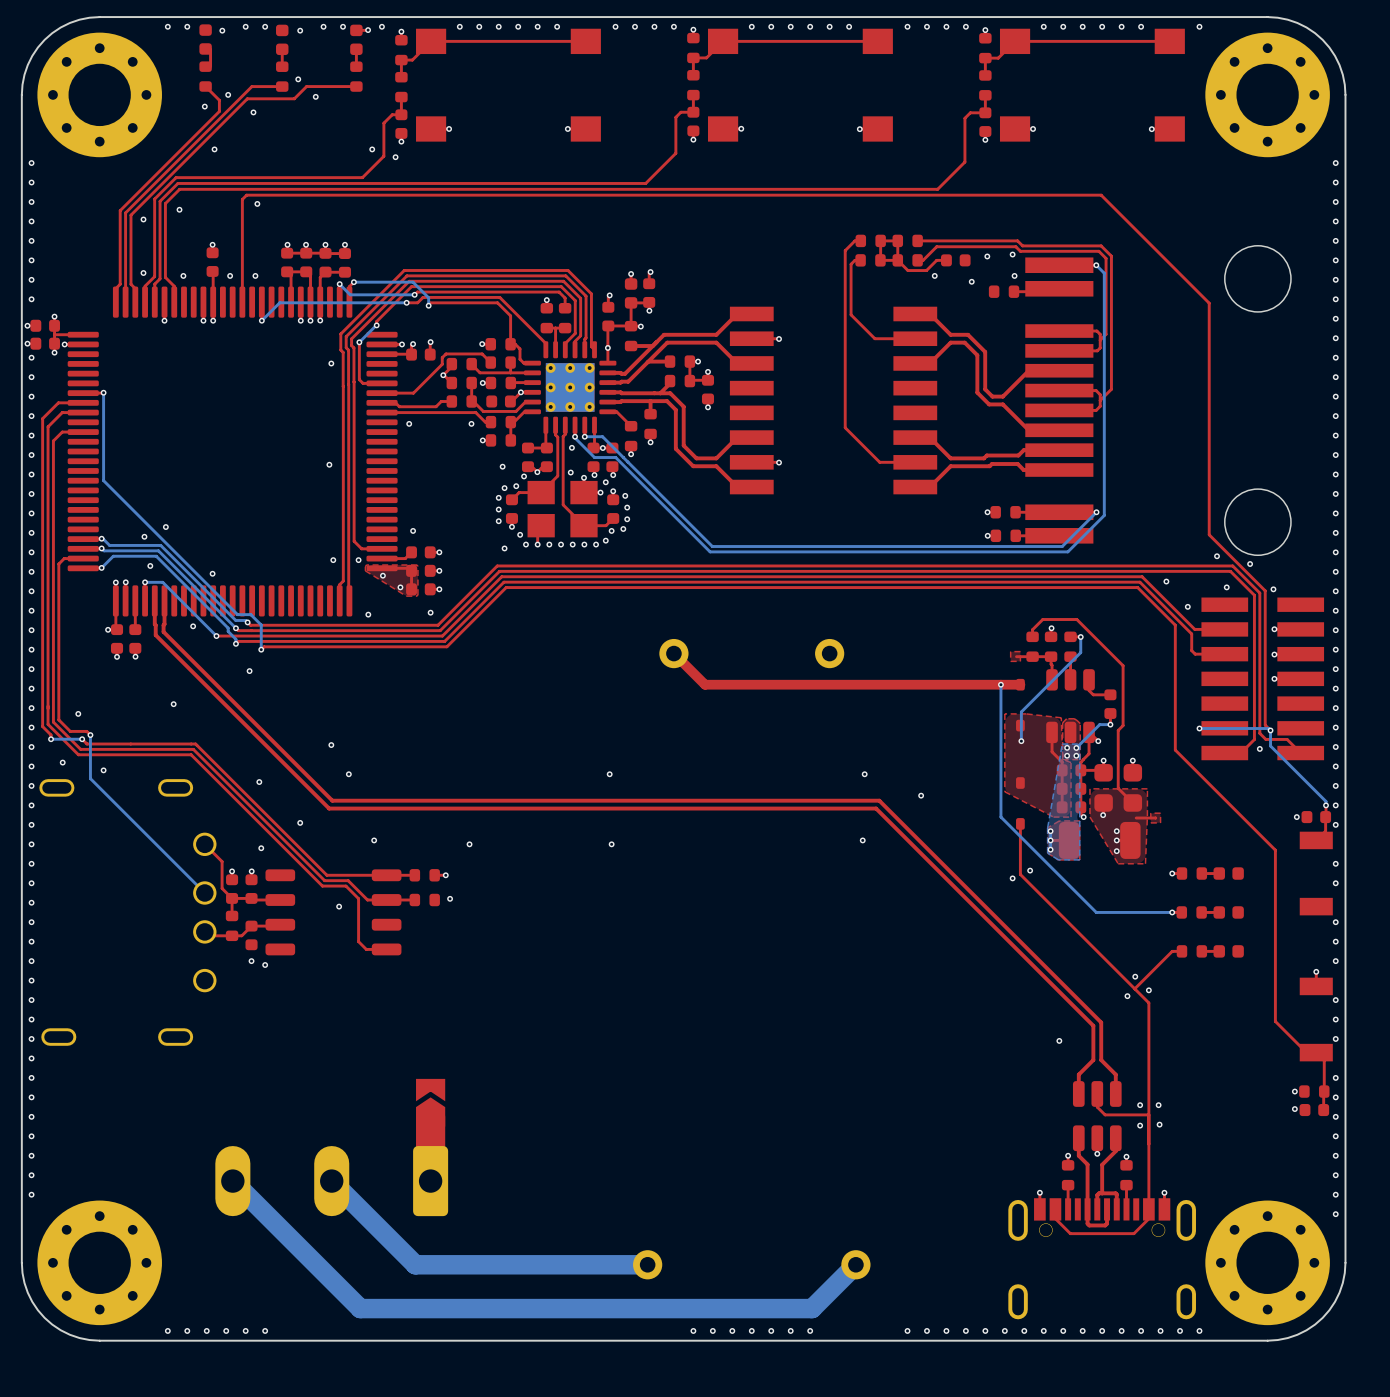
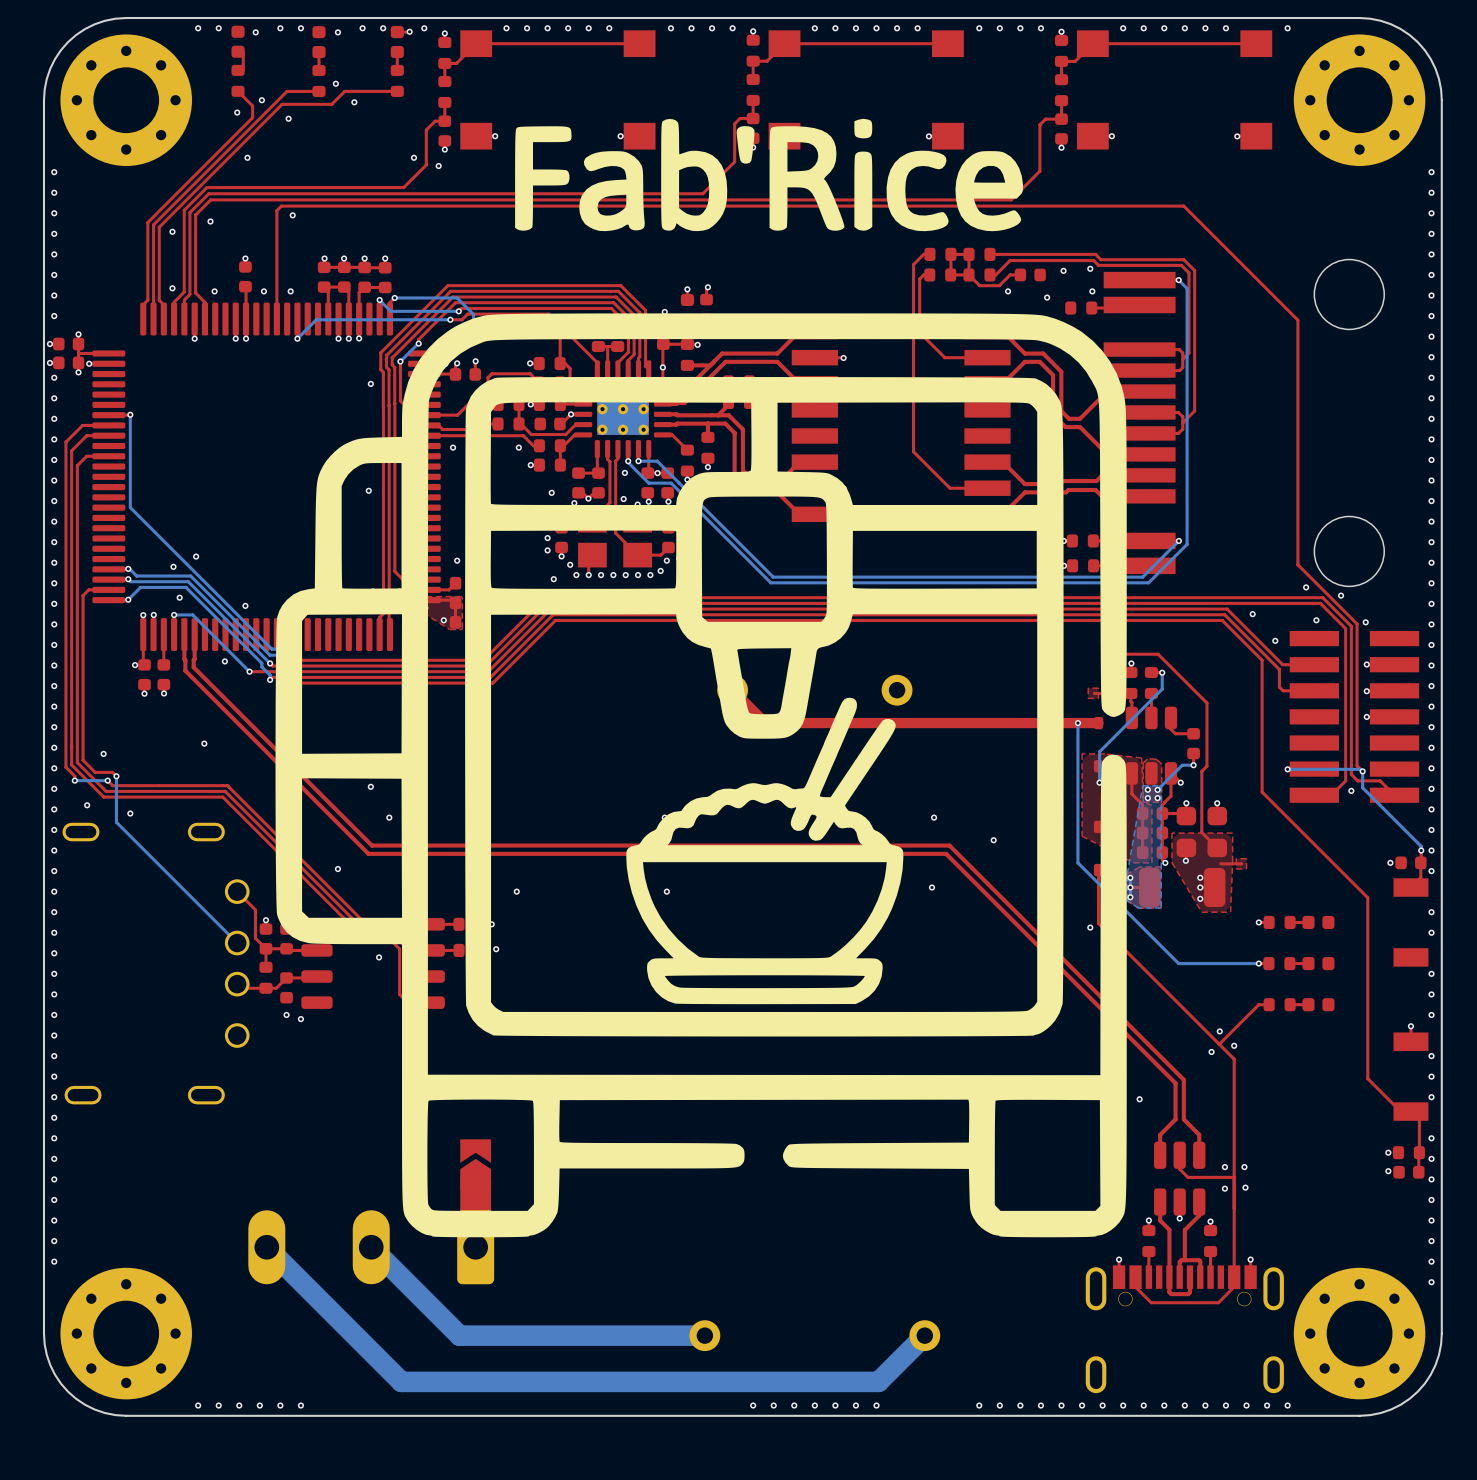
drawing: none -> [275, 118, 1127, 1238]

